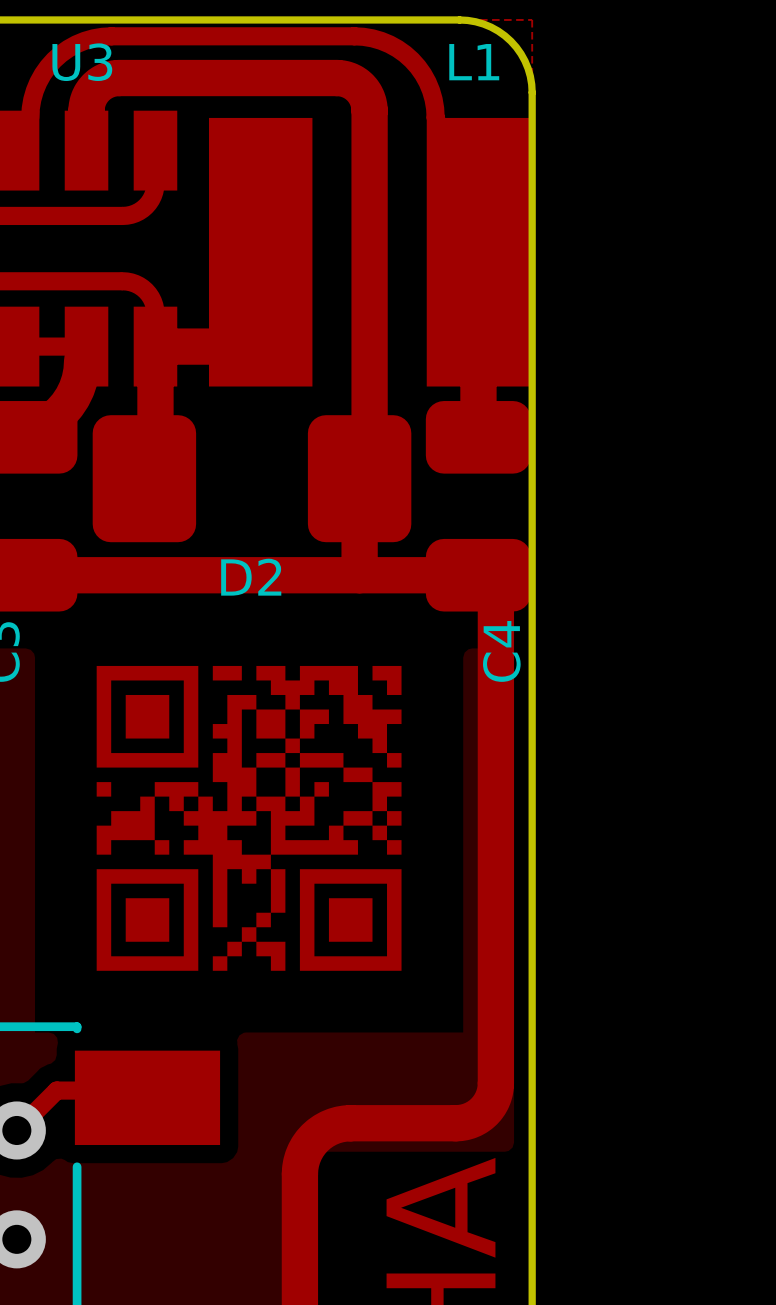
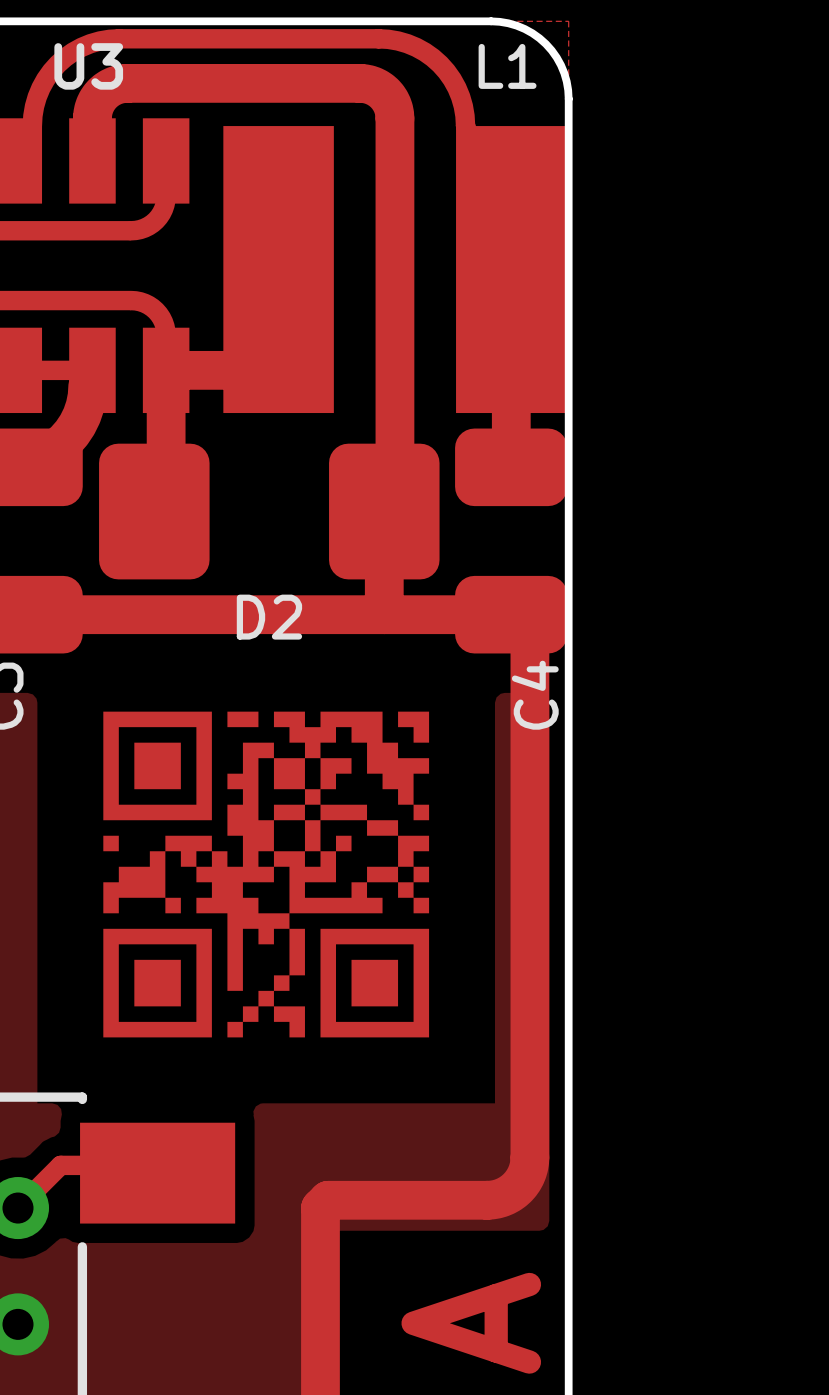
track: (350, 1123) (333, 1126) (314, 1138) (304, 1151) (299, 1174) -> (374, 1200) (328, 1200) (320, 1208) (320, 1254)

